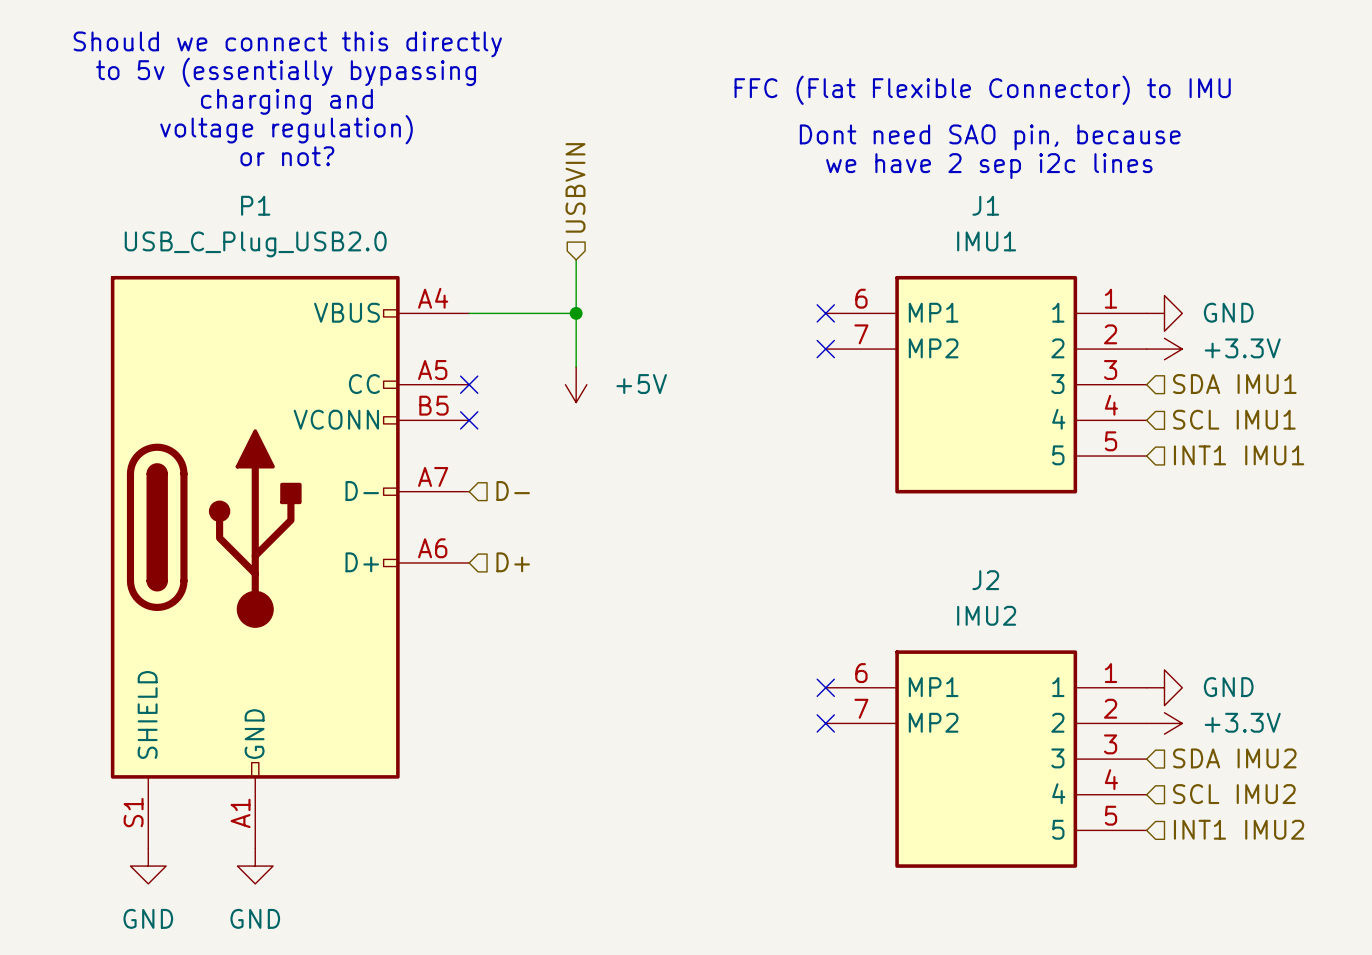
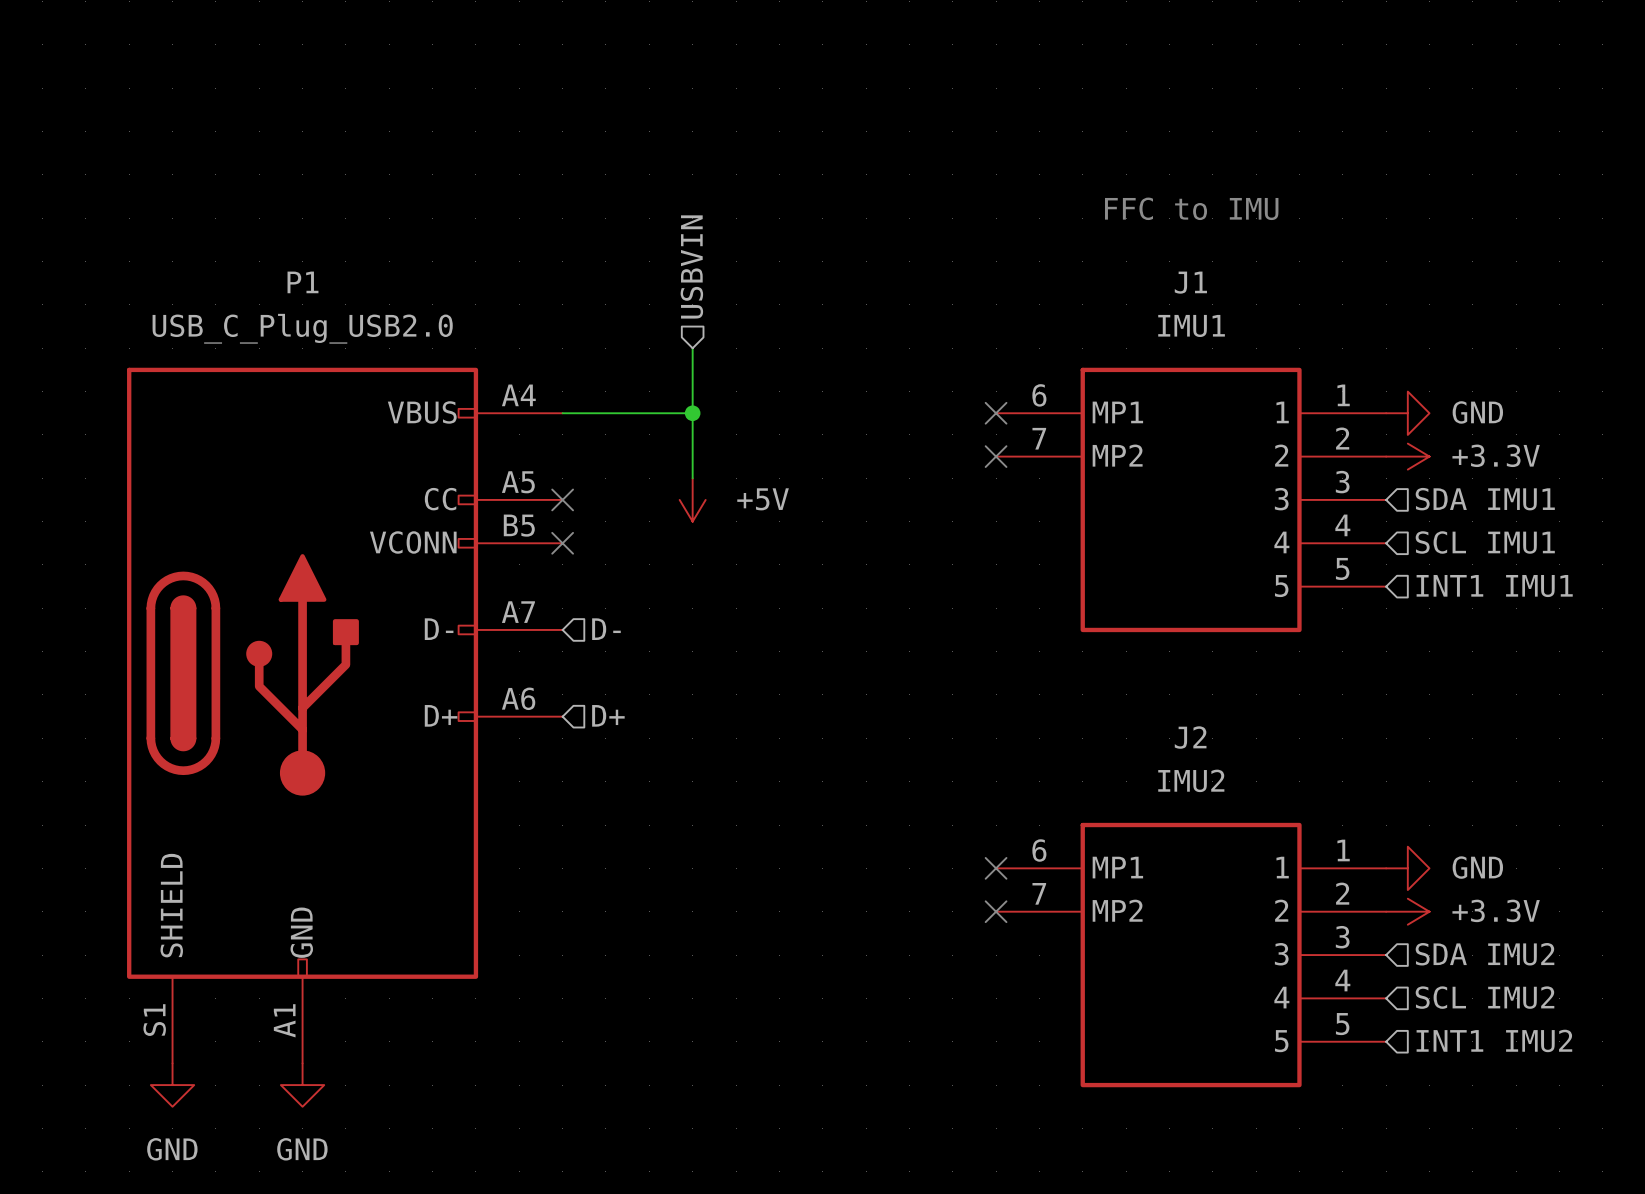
text: Should we connect this directly (287, 44) -> none
text: to 5v (essentially bypassing (286, 72) -> none
text: FFC (Flat Flexible Connector) to IMU (982, 90) -> none
text: charging and (286, 101) -> none
text: voltage regulation) (286, 129) -> none
text: Dont need SAO pin, because (990, 137) -> none
text: none -> FFC to IMU (1191, 208)
text: or not? (287, 156) -> none
text: we have 2 sep i2c lines (989, 166) -> none

